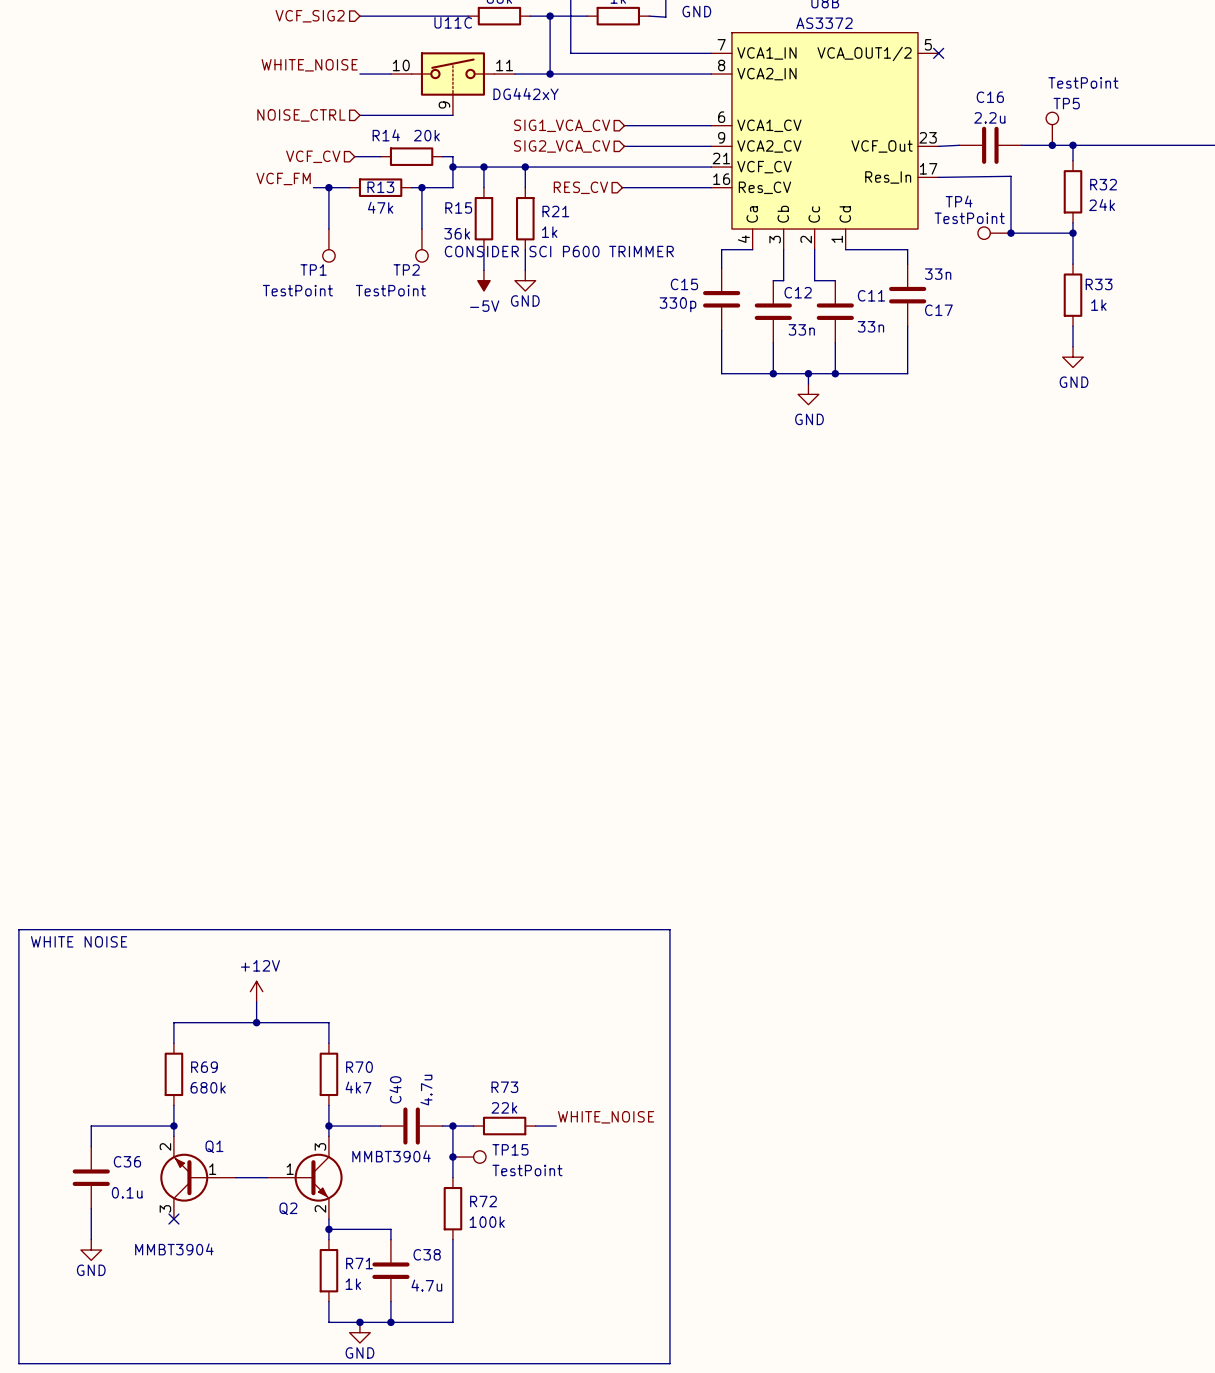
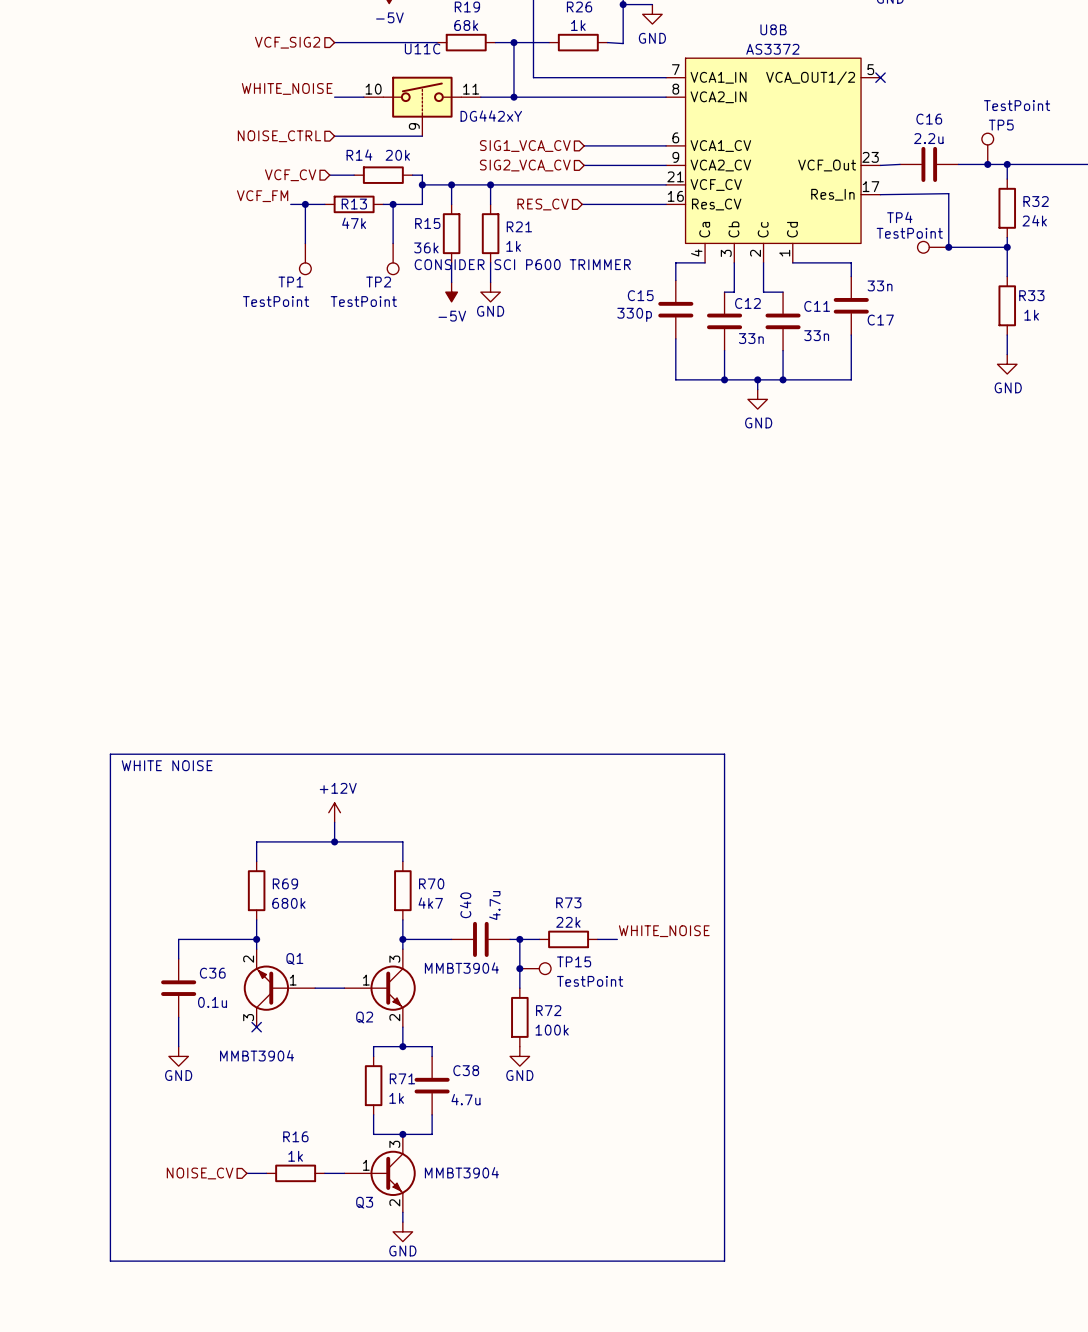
line: none -> (110, 754) (110, 1261) (724, 1261) (724, 754) (110, 754)
junction: none -> (334, 841)
line: (18, 929) (18, 1363) (669, 1363) (669, 929) (18, 929) -> none
text position: WHITE NOISE (79, 941) -> WHITE NOISE (167, 765)
junction: none -> (256, 939)
junction: none -> (402, 939)
junction: none -> (519, 939)
power symbol position: +12V (256, 991) -> +12V (334, 812)
junction: none -> (519, 968)
wire: (256, 1002) (256, 1022) -> (334, 822) (334, 841)
junction: (256, 1022) -> none
wire: (173, 1043) (173, 1022) (328, 1022) (328, 1043) -> (256, 861) (256, 841) (402, 841) (402, 861)
no-connect mark: none -> (256, 1027)
R69 position: (173, 1074) -> (256, 890)
R70 position: (328, 1074) -> (402, 890)
junction: none -> (402, 1046)
power symbol: none -> GND (178, 1056)
wire: none -> (373, 1056) (373, 1046) (432, 1046) (432, 1056)
power symbol: none -> GND (519, 1056)
wire: (173, 1105) (173, 1136) -> (256, 919) (256, 949)
wire: (328, 1105) (328, 1136) -> (402, 919) (402, 949)
label position: WHITE_NOISE (606, 1117) -> WHITE_NOISE (664, 931)
wire: (173, 1126) (91, 1126) (91, 1146) -> (256, 939) (178, 939) (178, 958)
junction: (173, 1126) -> none
wire: (328, 1126) (380, 1126) -> (402, 939) (451, 939)
junction: (328, 1126) -> none
C40 position: (411, 1126) -> (480, 939)
wire: (442, 1126) (473, 1126) -> (510, 939) (539, 939)
wire: (452, 1126) (452, 1177) -> (519, 939) (519, 988)
junction: (452, 1126) -> none
R73 position: (504, 1126) -> (568, 939)
wire: (535, 1126) (556, 1126) -> (597, 939) (617, 939)
wire: none -> (373, 1114) (373, 1134) (432, 1134) (432, 1114)
junction: (452, 1157) -> none
TP15 position: (469, 1157) -> (535, 968)
junction: none -> (402, 1134)
C36 position: (91, 1177) -> (178, 988)
Q1 position: (198, 1177) -> (279, 988)
wire: (235, 1177) (266, 1177) -> (315, 988) (344, 988)
Q2 position: (304, 1177) -> (380, 988)
wire: (91, 1208) (91, 1239) -> (178, 1017) (178, 1046)
R72 position: (452, 1208) -> (519, 1017)
wire: none -> (246, 1173) (266, 1173)
R16: none -> 1k (295, 1173)
wire: none -> (324, 1173) (344, 1173)
Q3: none -> MMBT3904 (380, 1173)
hierarchical label: none -> NOISE_CV (200, 1173)
no-connect mark: (173, 1219) -> none
wire: (328, 1219) (328, 1239) -> (402, 1027) (402, 1046)
wire: (328, 1229) (390, 1229) (390, 1239) -> none
junction: (328, 1229) -> none
wire: (452, 1239) (452, 1322) (328, 1322) (328, 1301) -> none
power symbol: GND (91, 1250) -> none
wire: none -> (402, 1212) (402, 1222)
R71 position: (328, 1270) -> (373, 1085)
C38 position: (390, 1270) -> (432, 1085)
wire: (390, 1301) (390, 1322) -> none
junction: (359, 1322) -> none
junction: (390, 1322) -> none
power symbol position: GND (359, 1332) -> GND (402, 1231)

